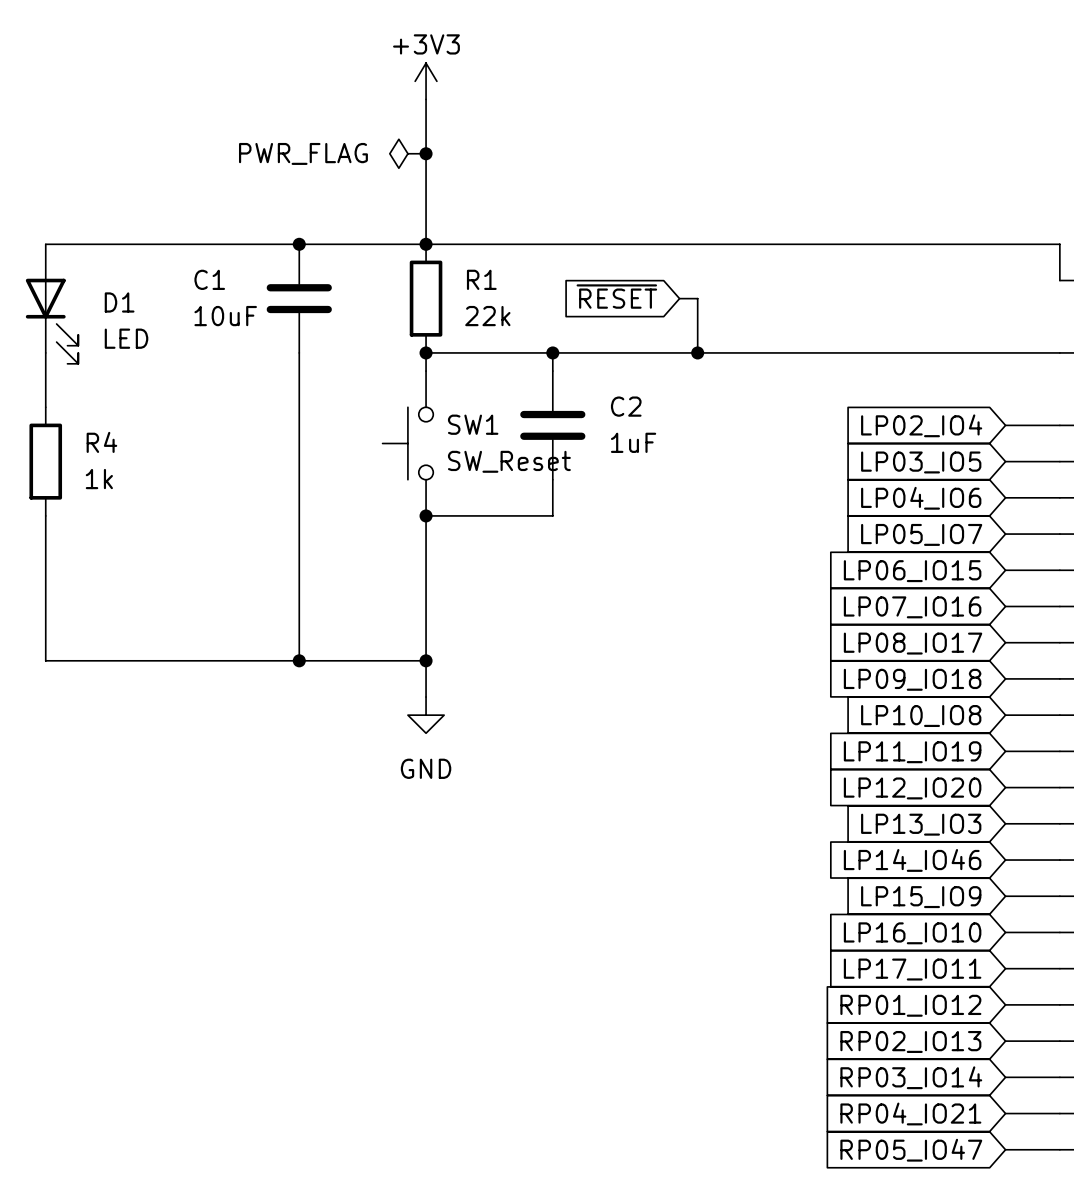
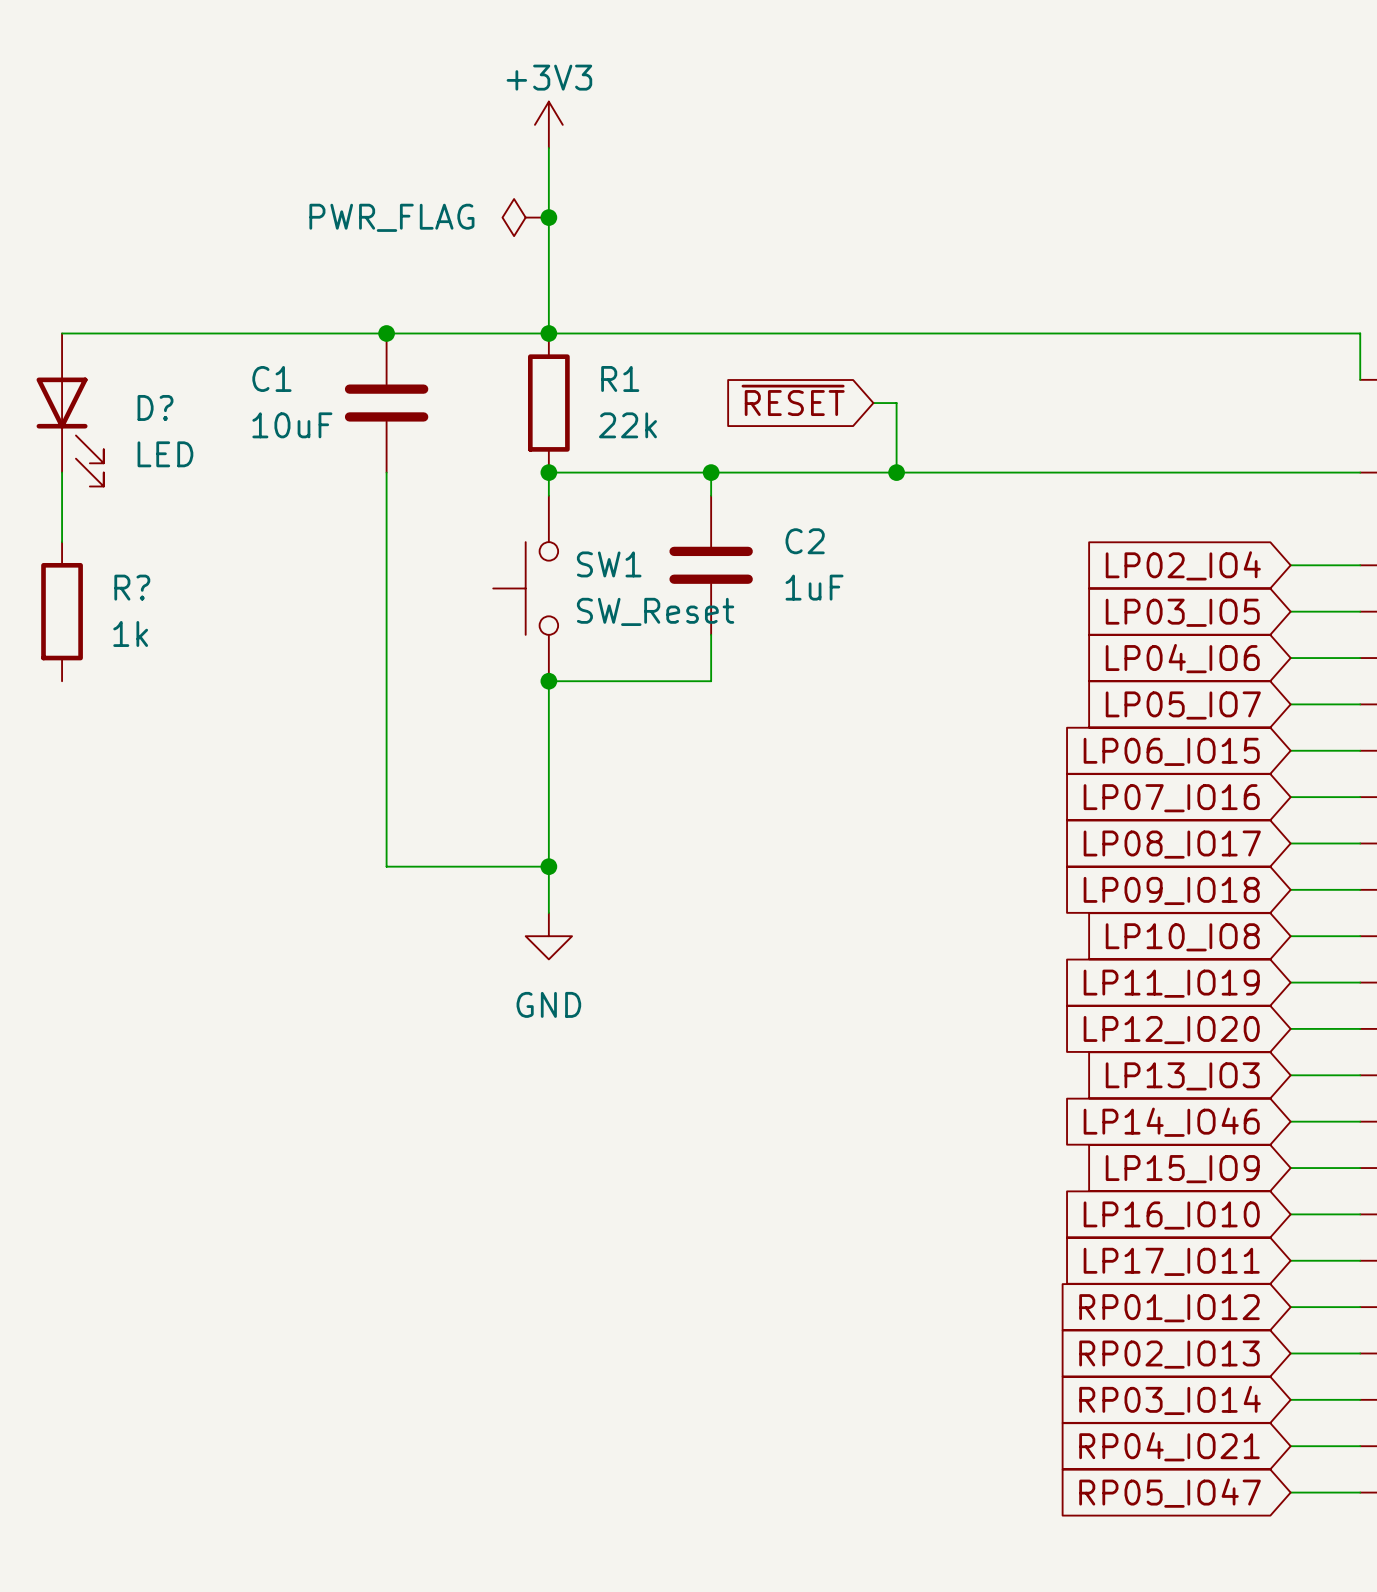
D1 name: D1 (119, 302) -> D? (155, 407)
R4 name: R4 (101, 442) -> R? (132, 587)
wire: (45, 515) (45, 660) (299, 660) -> none
junction: (299, 660) -> none

